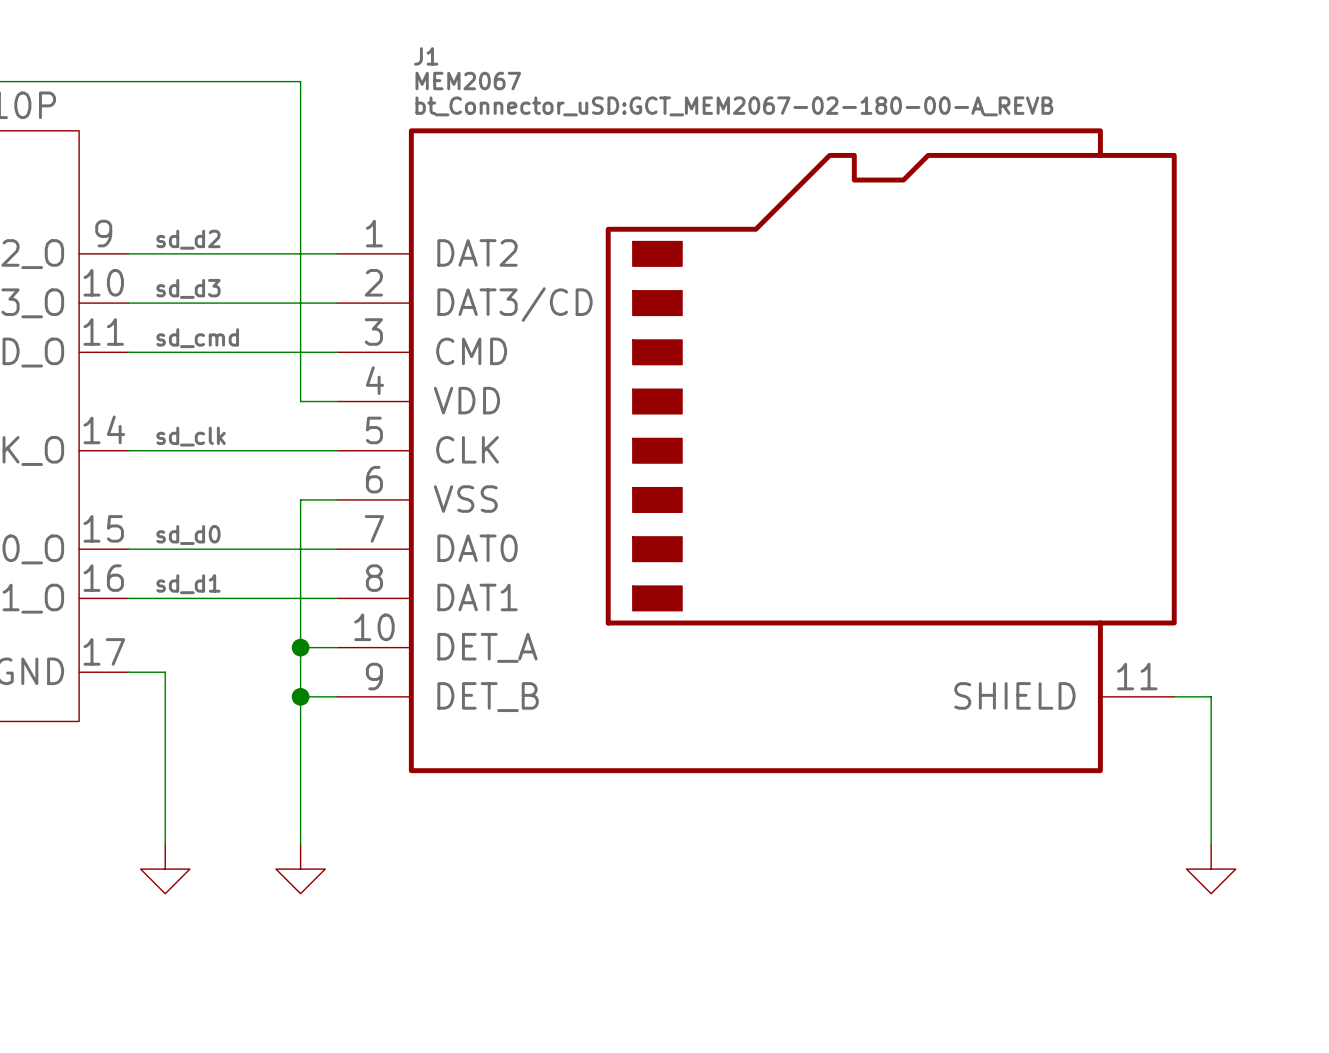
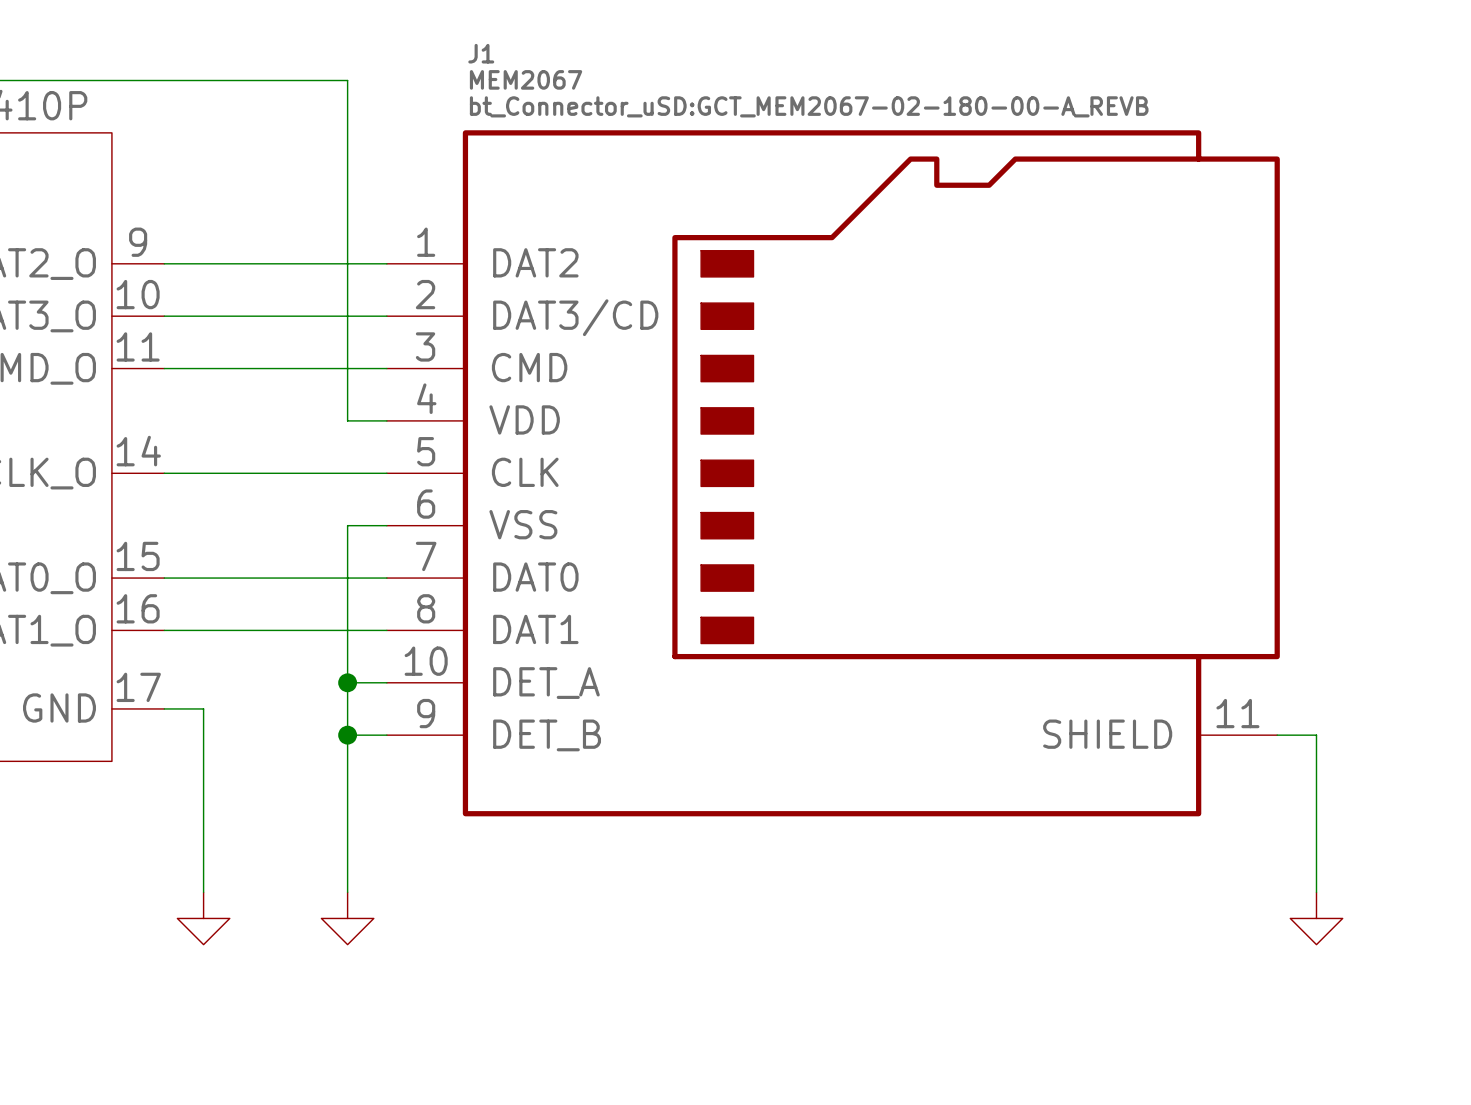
label: sd_d2 (188, 239) -> none
label: sd_d3 (188, 288) -> none
label: sd_cmd (197, 338) -> none
label: sd_clk (191, 436) -> none
label: sd_d0 (188, 534) -> none
label: sd_d1 (188, 584) -> none

